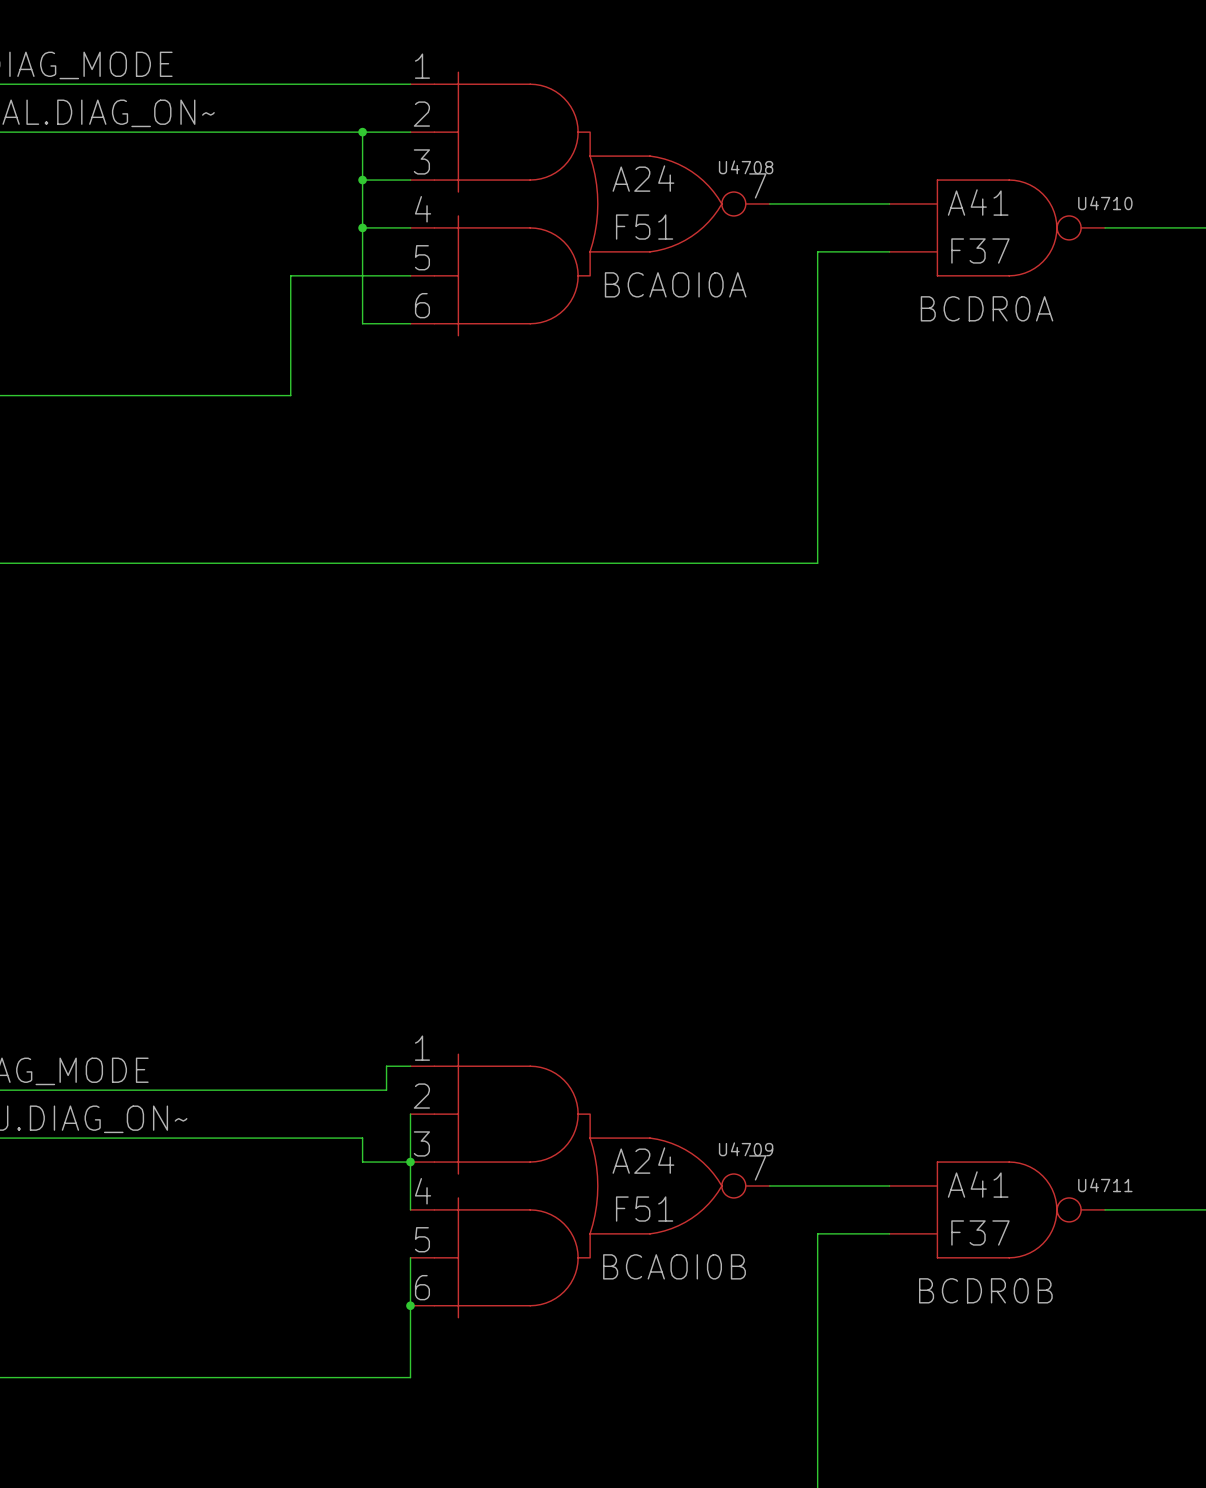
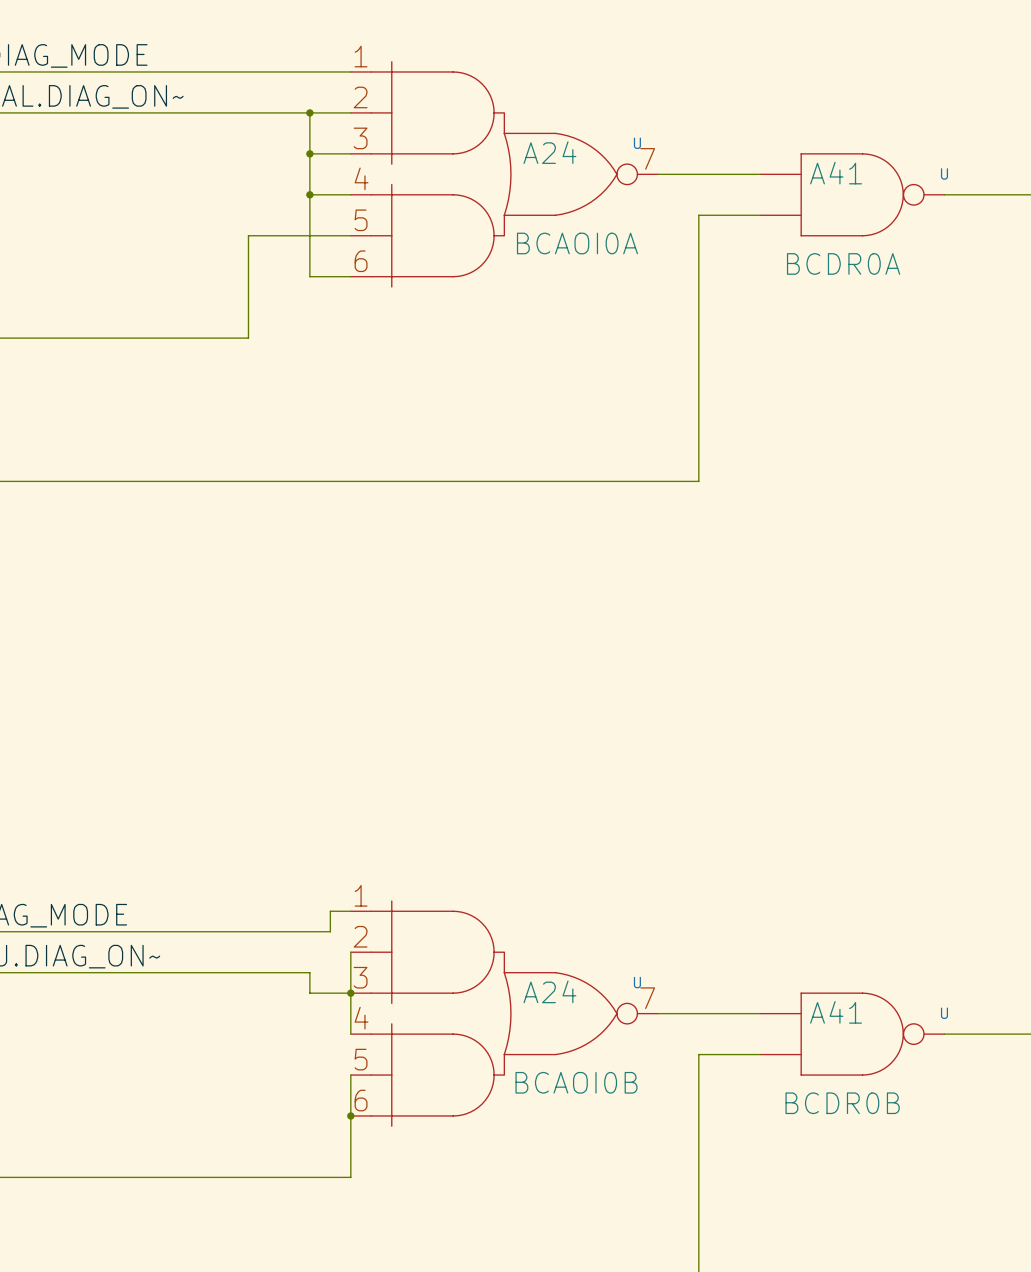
U4708 name: U4708 (746, 167) -> U (637, 143)
U4710 name: U4710 (1105, 203) -> U (944, 173)
U4708 value: F51 (644, 227) -> none
U4710 value: F37 (980, 250) -> none
U4709 name: U4709 (746, 1149) -> U (637, 982)
U4711 name: U4711 (1105, 1185) -> U (944, 1013)
U4709 value: F51 (644, 1209) -> none
U4711 value: F37 (980, 1232) -> none

